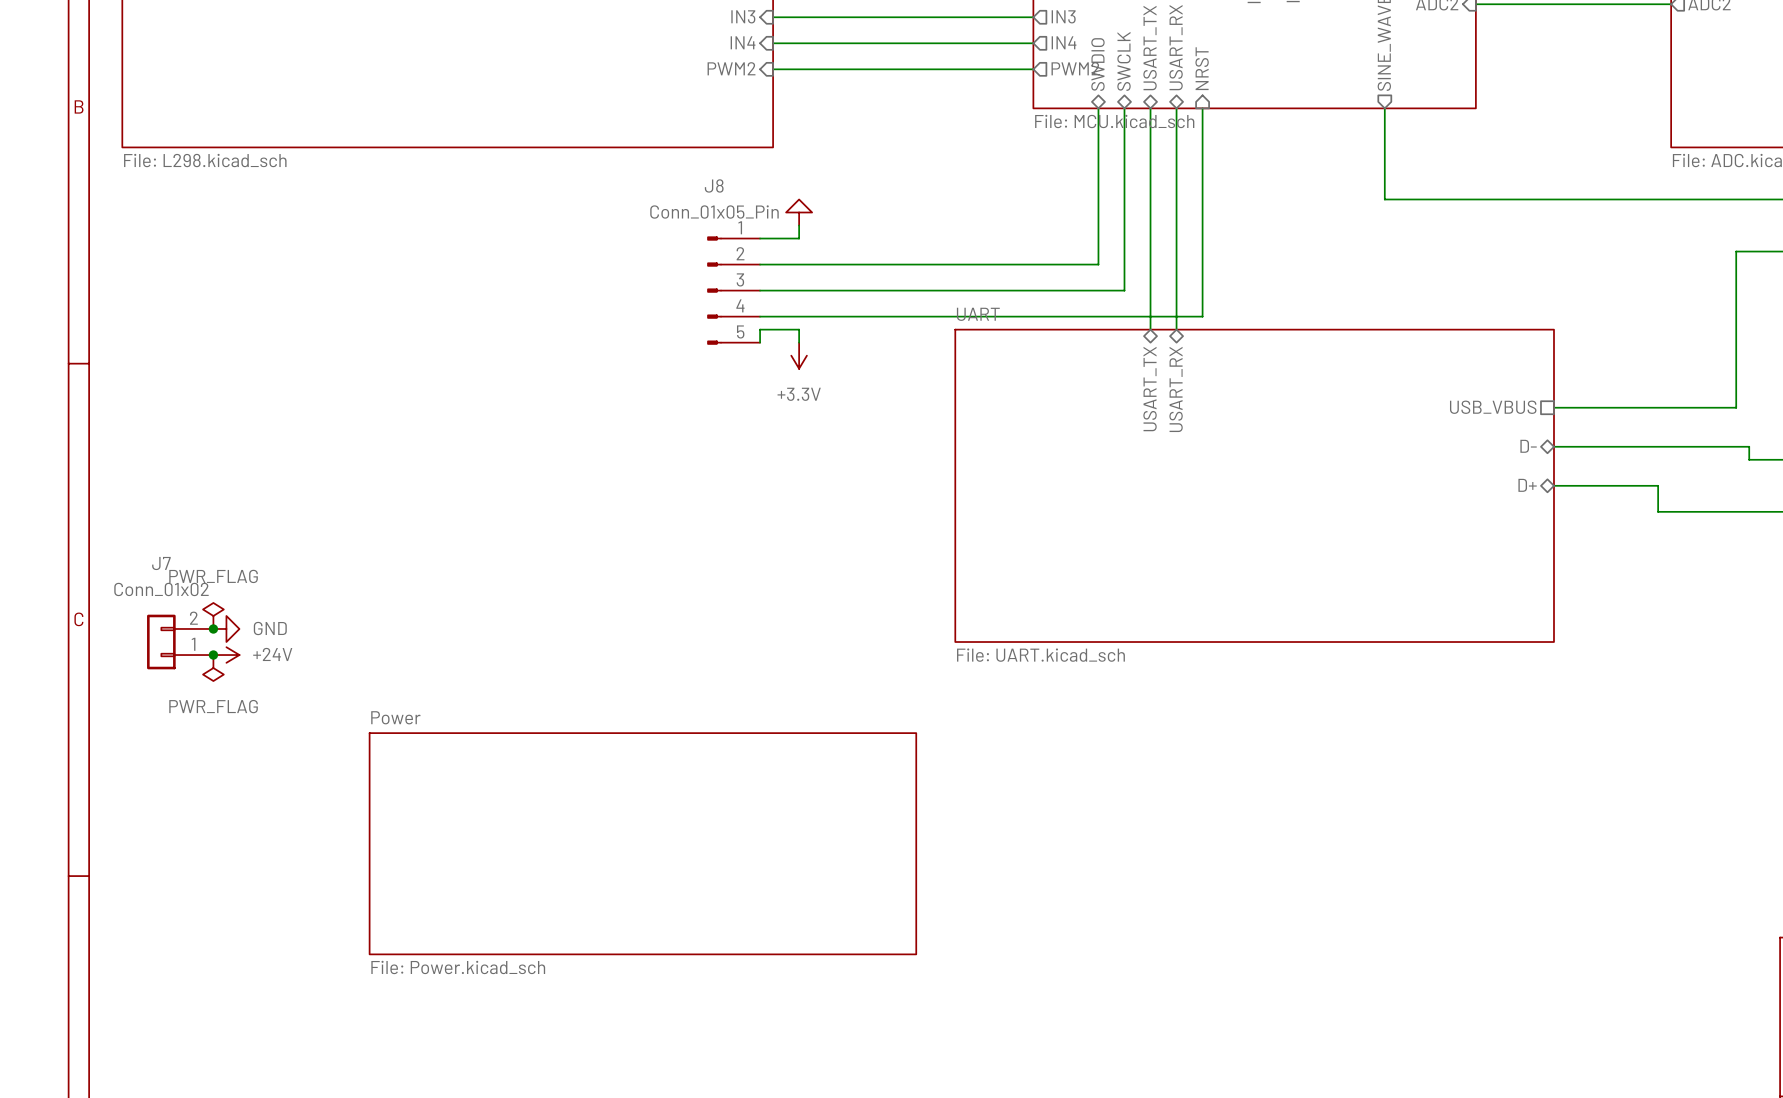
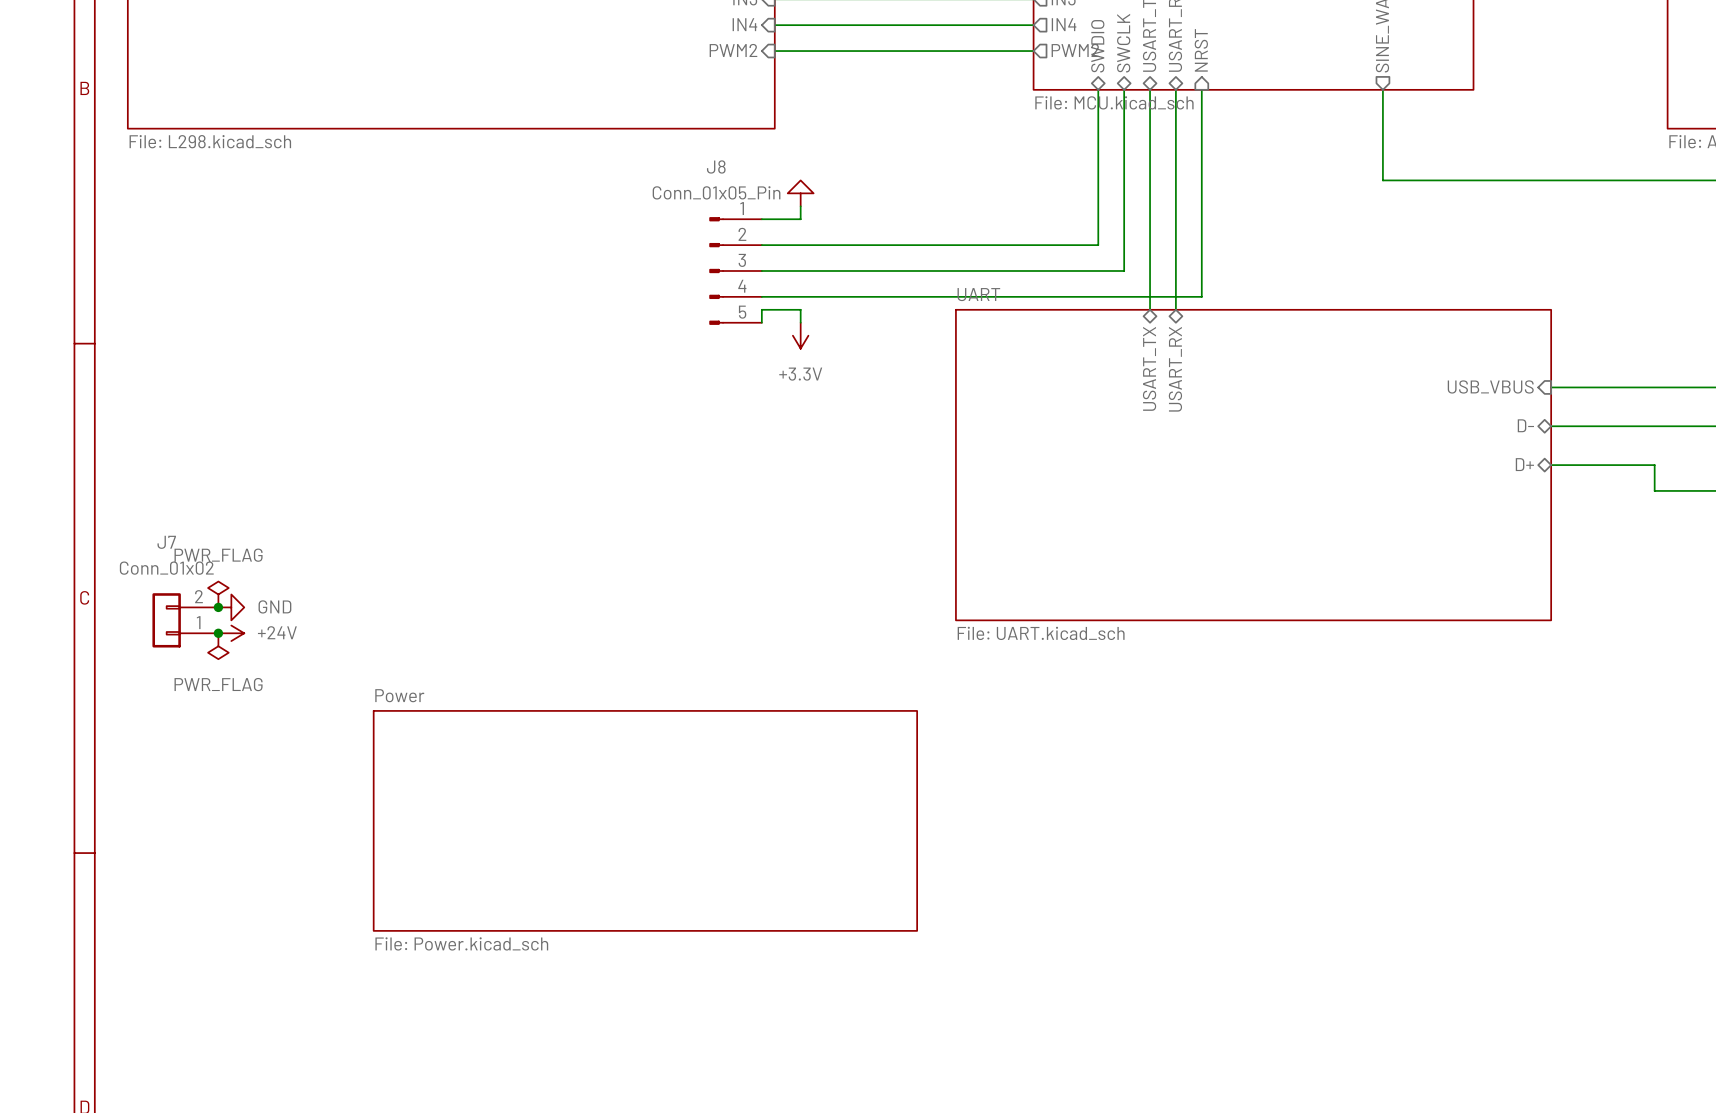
sheet pin shape: passive (1493, 407) -> input (1490, 386)

